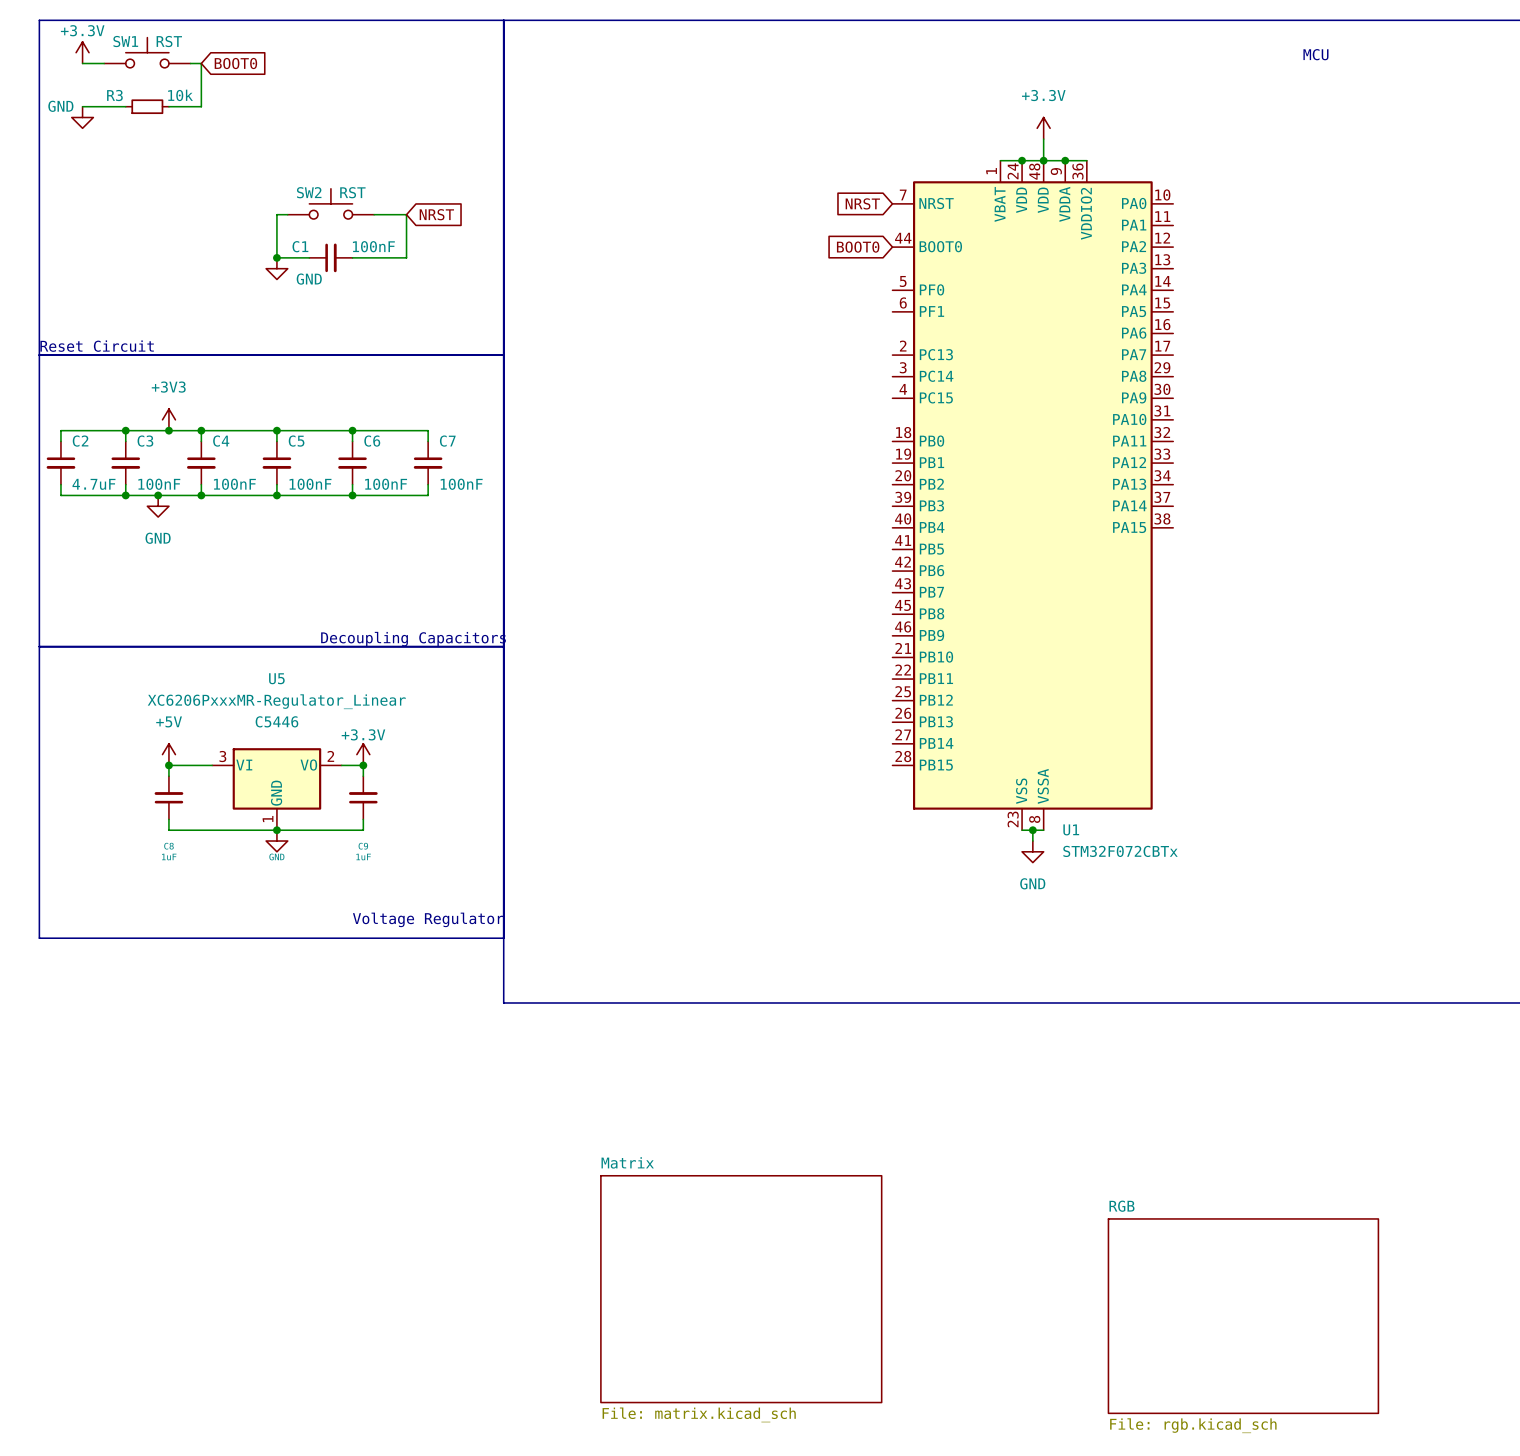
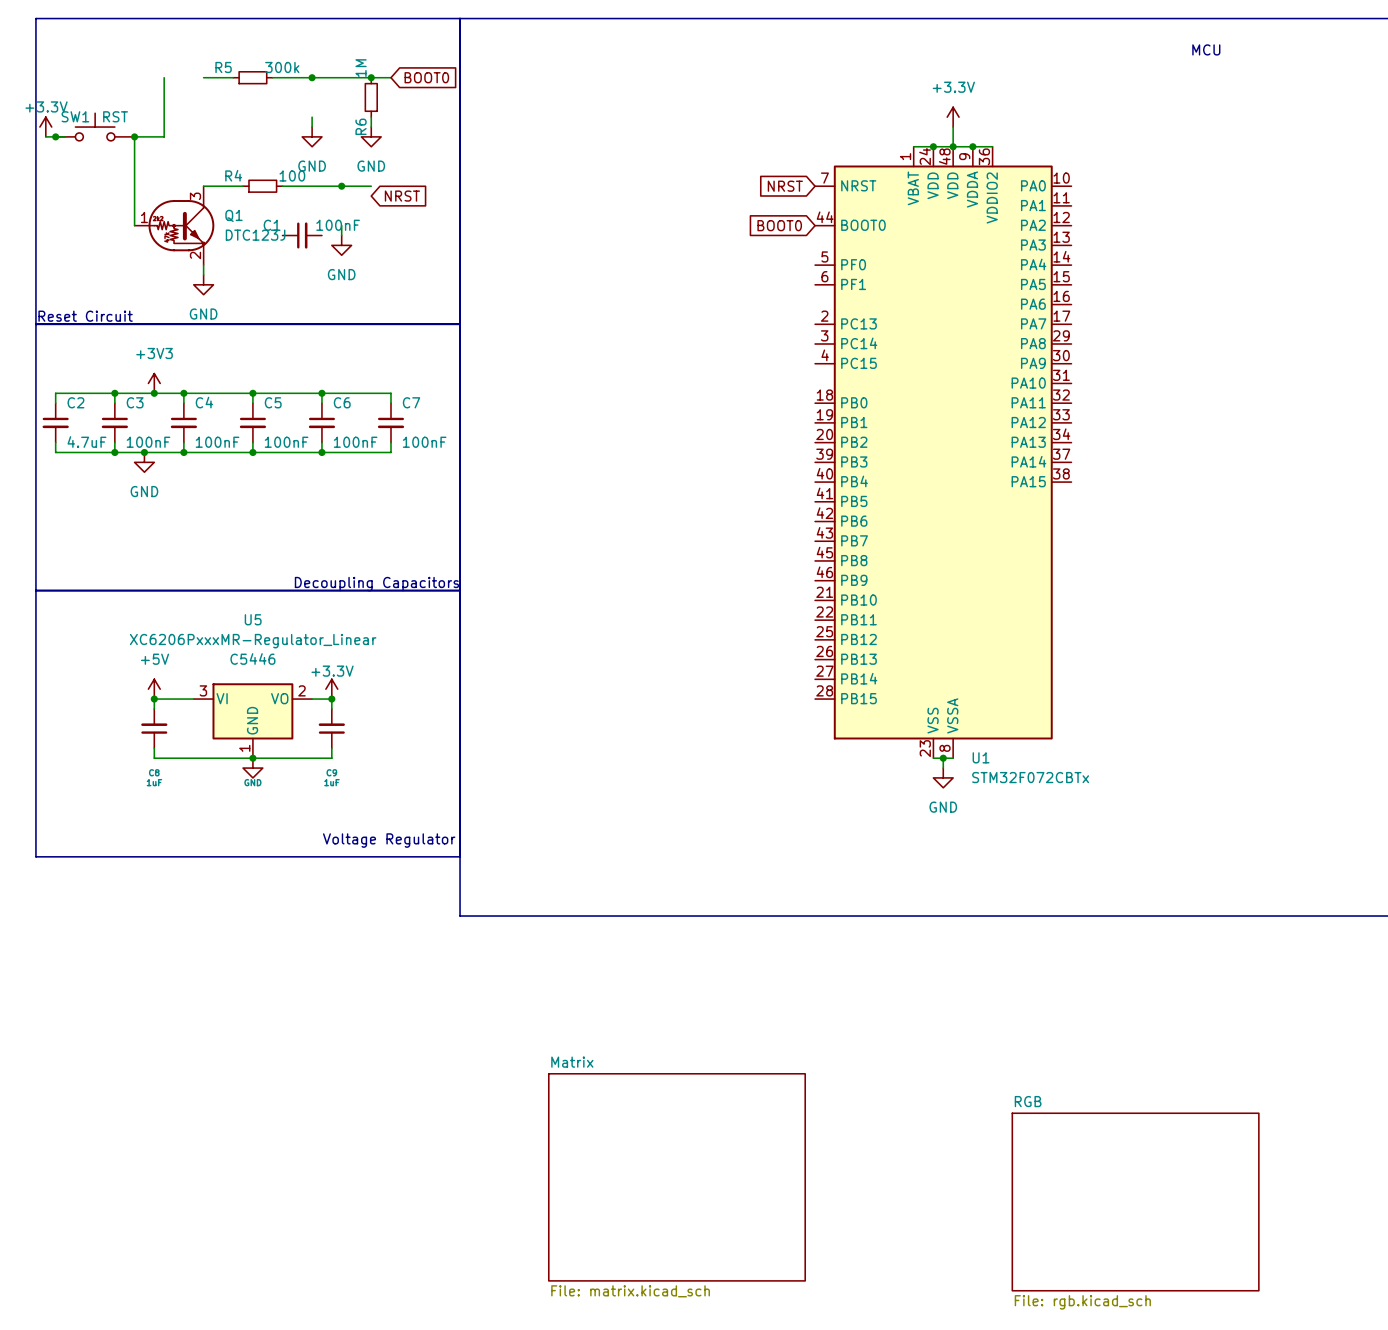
power symbol position: +3.3V (82, 52) -> +3.3V (45, 127)
SW1 position: (147, 52) -> (95, 127)
wire: (82, 63) (104, 63) -> (45, 136) (65, 136)
wire: (190, 63) (201, 63) (201, 106) (168, 106) -> none
global label: BOOT0 (235, 63) -> none
wire: none -> (164, 77) (164, 136) (134, 136) (134, 225)
wire: none -> (203, 77) (233, 77)
R5: none -> 300k (252, 77)
wire: none -> (272, 77) (390, 77)
junction: none -> (312, 77)
junction: none -> (371, 77)
global label: none -> BOOT0 (426, 77)
wire: (82, 106) (125, 106) -> (203, 186) (243, 186)
R3: 10k (147, 106) -> none
R6: none -> 1M (371, 97)
power symbol: GND (82, 117) -> none
wire: none -> (312, 117) (312, 127)
wire: none -> (371, 117) (371, 127)
junction: none -> (55, 136)
junction: none -> (134, 136)
power symbol: none -> GND (312, 136)
power symbol: none -> GND (371, 136)
R4: none -> 100 (262, 186)
wire: none -> (282, 186) (371, 186)
SW2: RST (330, 203) -> none
junction: none -> (341, 186)
wire: (287, 214) (276, 214) (276, 257) (309, 257) -> none
wire: (374, 214) (406, 214) (406, 257) (352, 257) -> none
Q1: none -> DTC123J (174, 225)
wire: none -> (341, 225) (341, 235)
junction: (276, 257) -> none
power symbol: GND (276, 268) -> none
power symbol: none -> GND (341, 245)
wire: none -> (203, 265) (203, 274)
power symbol: none -> GND (203, 284)

